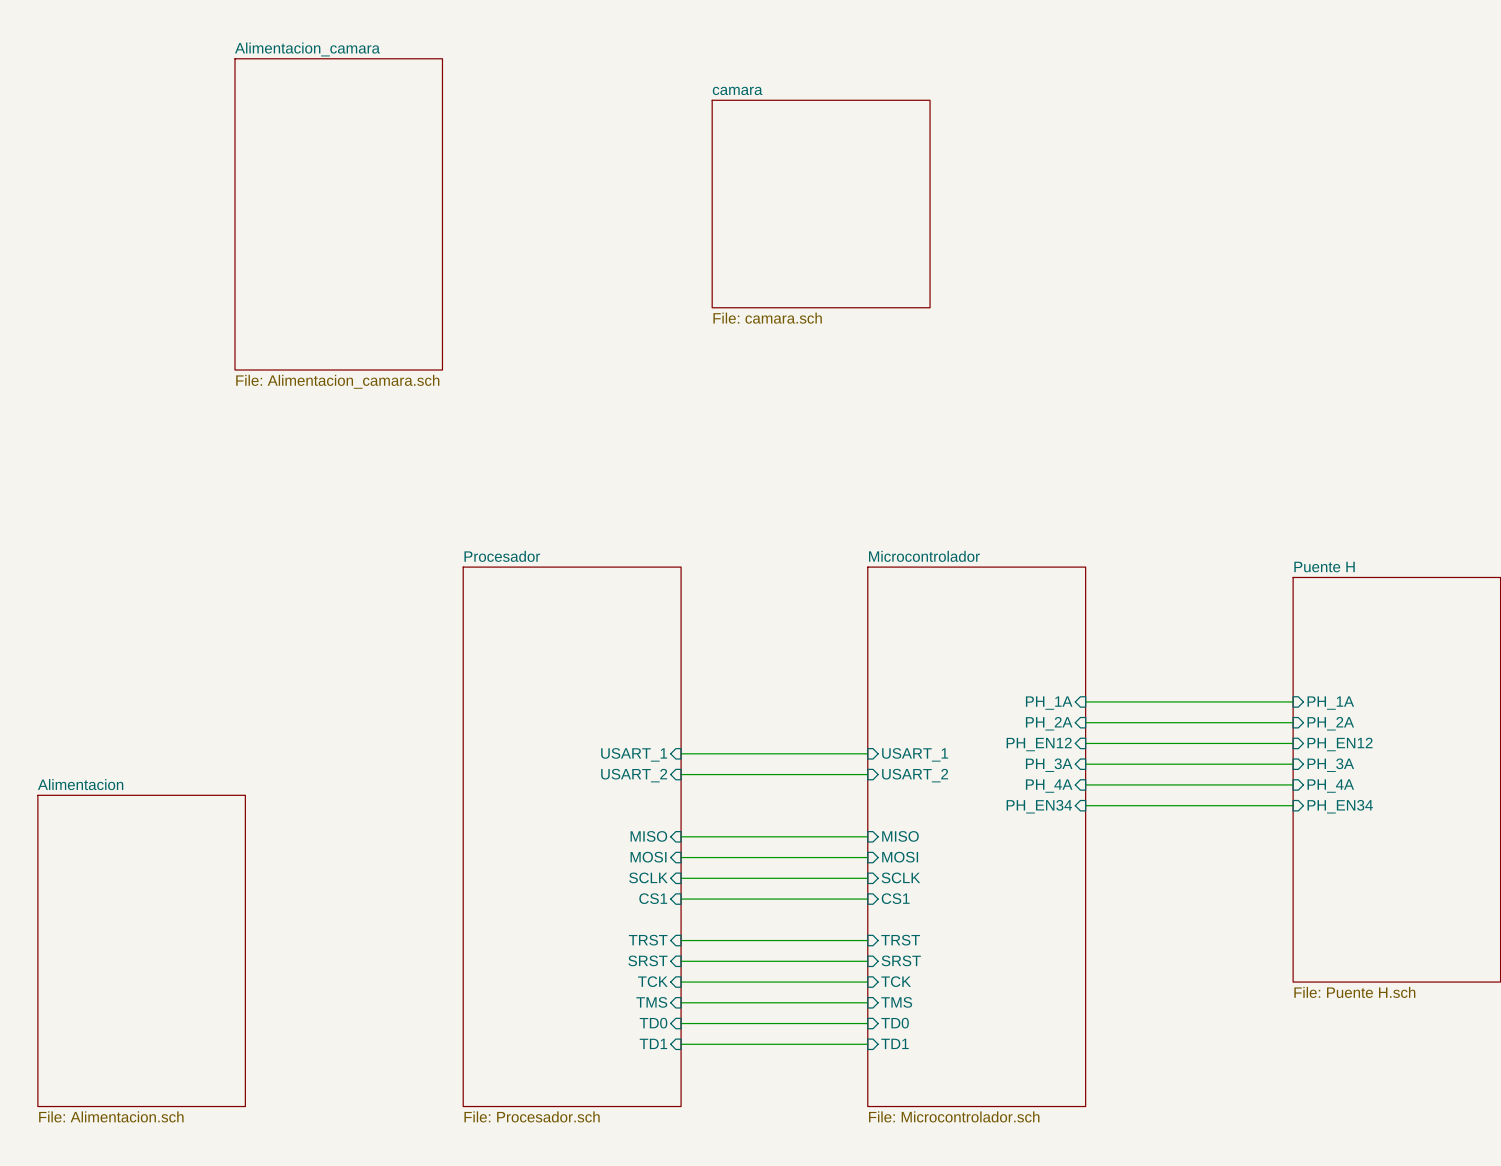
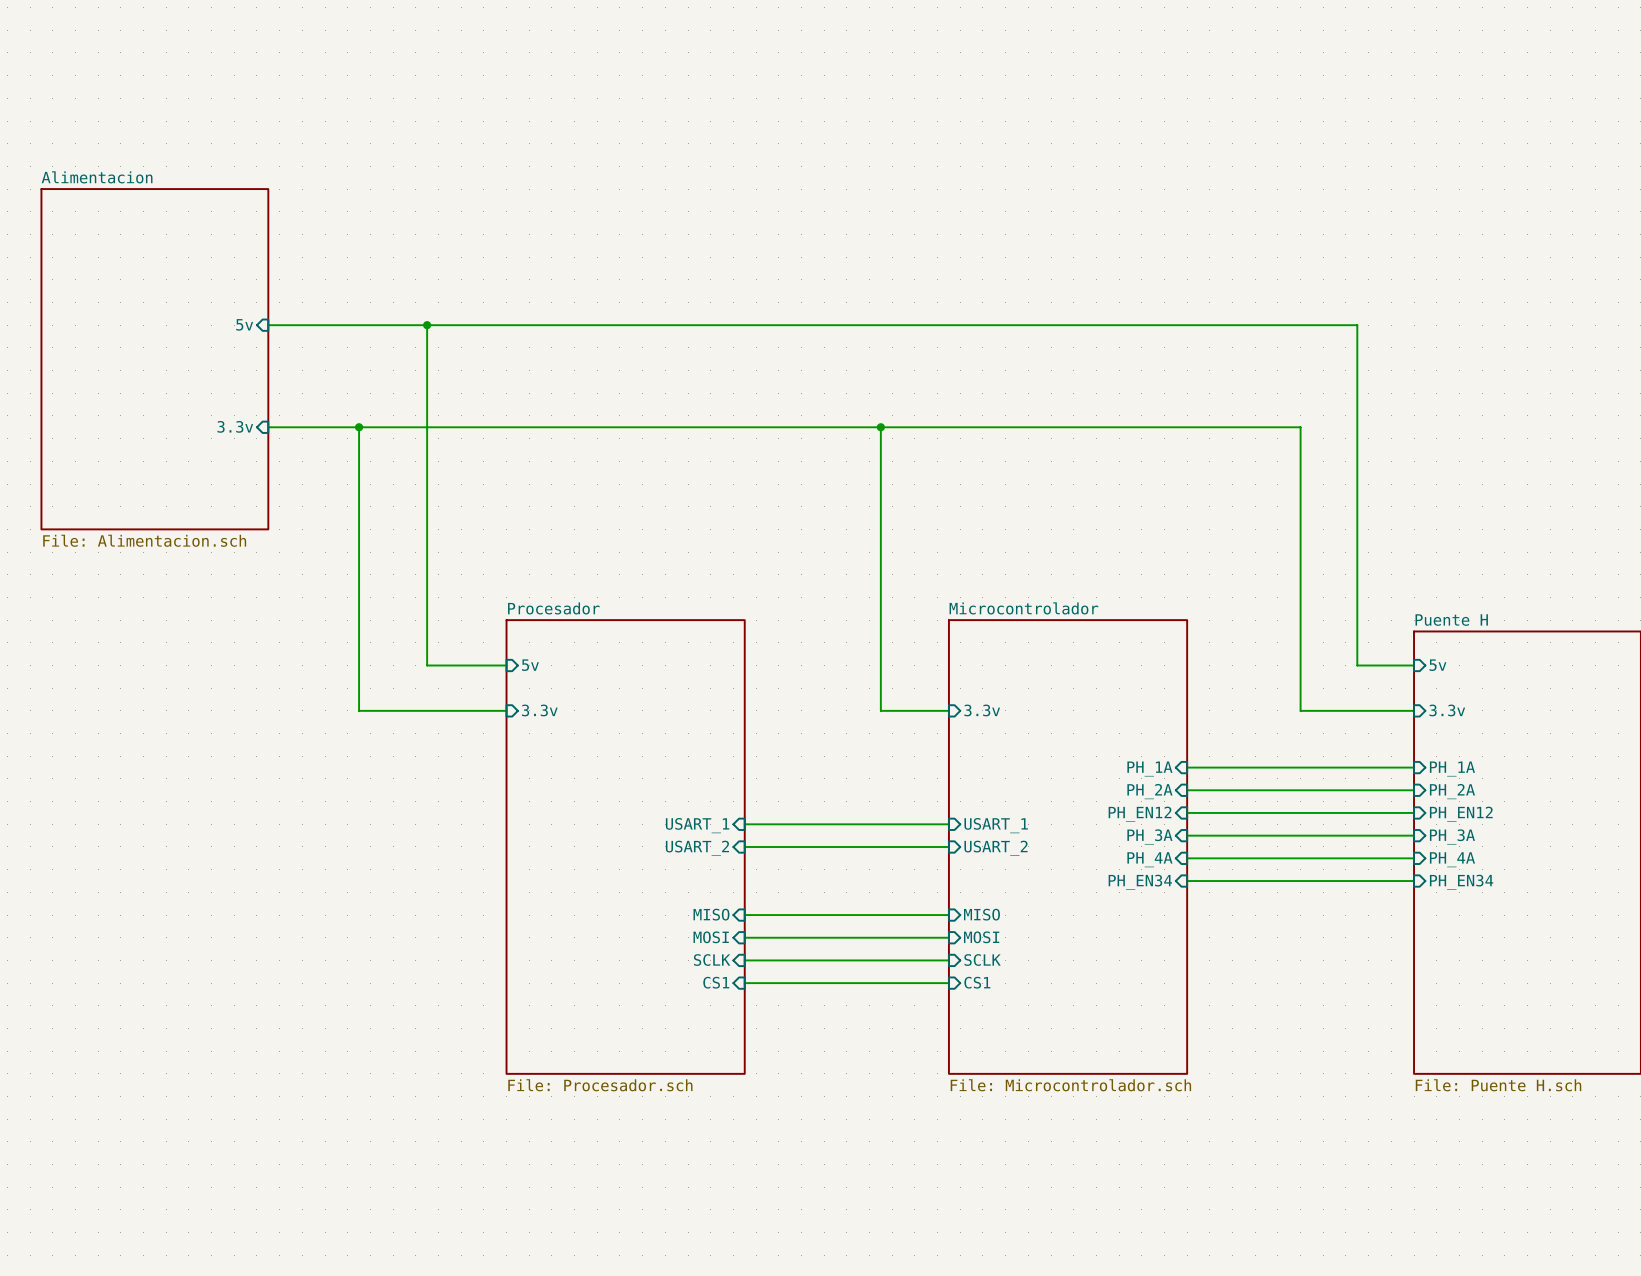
sheet camara: File: camara.sch (821, 204) -> none
sheet Alimentacion_camara: File: Alimentacion_camara.sch (338, 214) -> none
sheet pin: none -> 5v (244, 324)
wire: none -> (268, 325) (1357, 325) (1357, 665) (1414, 665)
wire: none -> (427, 325) (427, 665) (506, 665)
junction: none -> (427, 325)
sheet Alimentacion: none -> File: Alimentacion.sch (154, 359)
sheet pin: none -> 3.3v (235, 426)
wire: none -> (268, 427) (1300, 427) (1300, 710) (1414, 710)
wire: none -> (359, 427) (359, 710) (506, 710)
junction: none -> (359, 427)
wire: none -> (880, 427) (880, 710) (948, 710)
junction: none -> (880, 427)
sheet pin: none -> 5v (530, 665)
sheet pin: none -> 5v (1437, 665)
sheet pin: none -> 3.3v (539, 710)
sheet pin: none -> 3.3v (982, 710)
sheet pin: none -> 3.3v (1447, 710)
sheet Procesador: none -> File: Procesador.sch (625, 846)
sheet Microcontrolador: none -> File: Microcontrolador.sch (1068, 846)
sheet Procesador: File: Procesador.sch (572, 836) -> none
sheet Microcontrolador: File: Microcontrolador.sch (976, 836) -> none
sheet pin: TRST (648, 940) -> none
wire: (681, 940) (867, 940) -> none
sheet pin: TRST (900, 940) -> none
sheet Alimentacion: File: Alimentacion.sch (141, 950) -> none
sheet pin: SRST (647, 960) -> none
sheet pin: SRST (901, 960) -> none
wire: (681, 961) (867, 961) -> none
sheet pin: TCK (652, 981) -> none
sheet pin: TCK (896, 981) -> none
wire: (681, 982) (867, 982) -> none
sheet pin: TMS (651, 1002) -> none
wire: (681, 1002) (867, 1002) -> none
sheet pin: TMS (896, 1002) -> none
sheet pin: TD0 (653, 1023) -> none
wire: (681, 1023) (867, 1023) -> none
sheet pin: TD0 (895, 1023) -> none
sheet pin: TD1 (653, 1043) -> none
sheet pin: TD1 (895, 1043) -> none
wire: (681, 1044) (867, 1044) -> none

